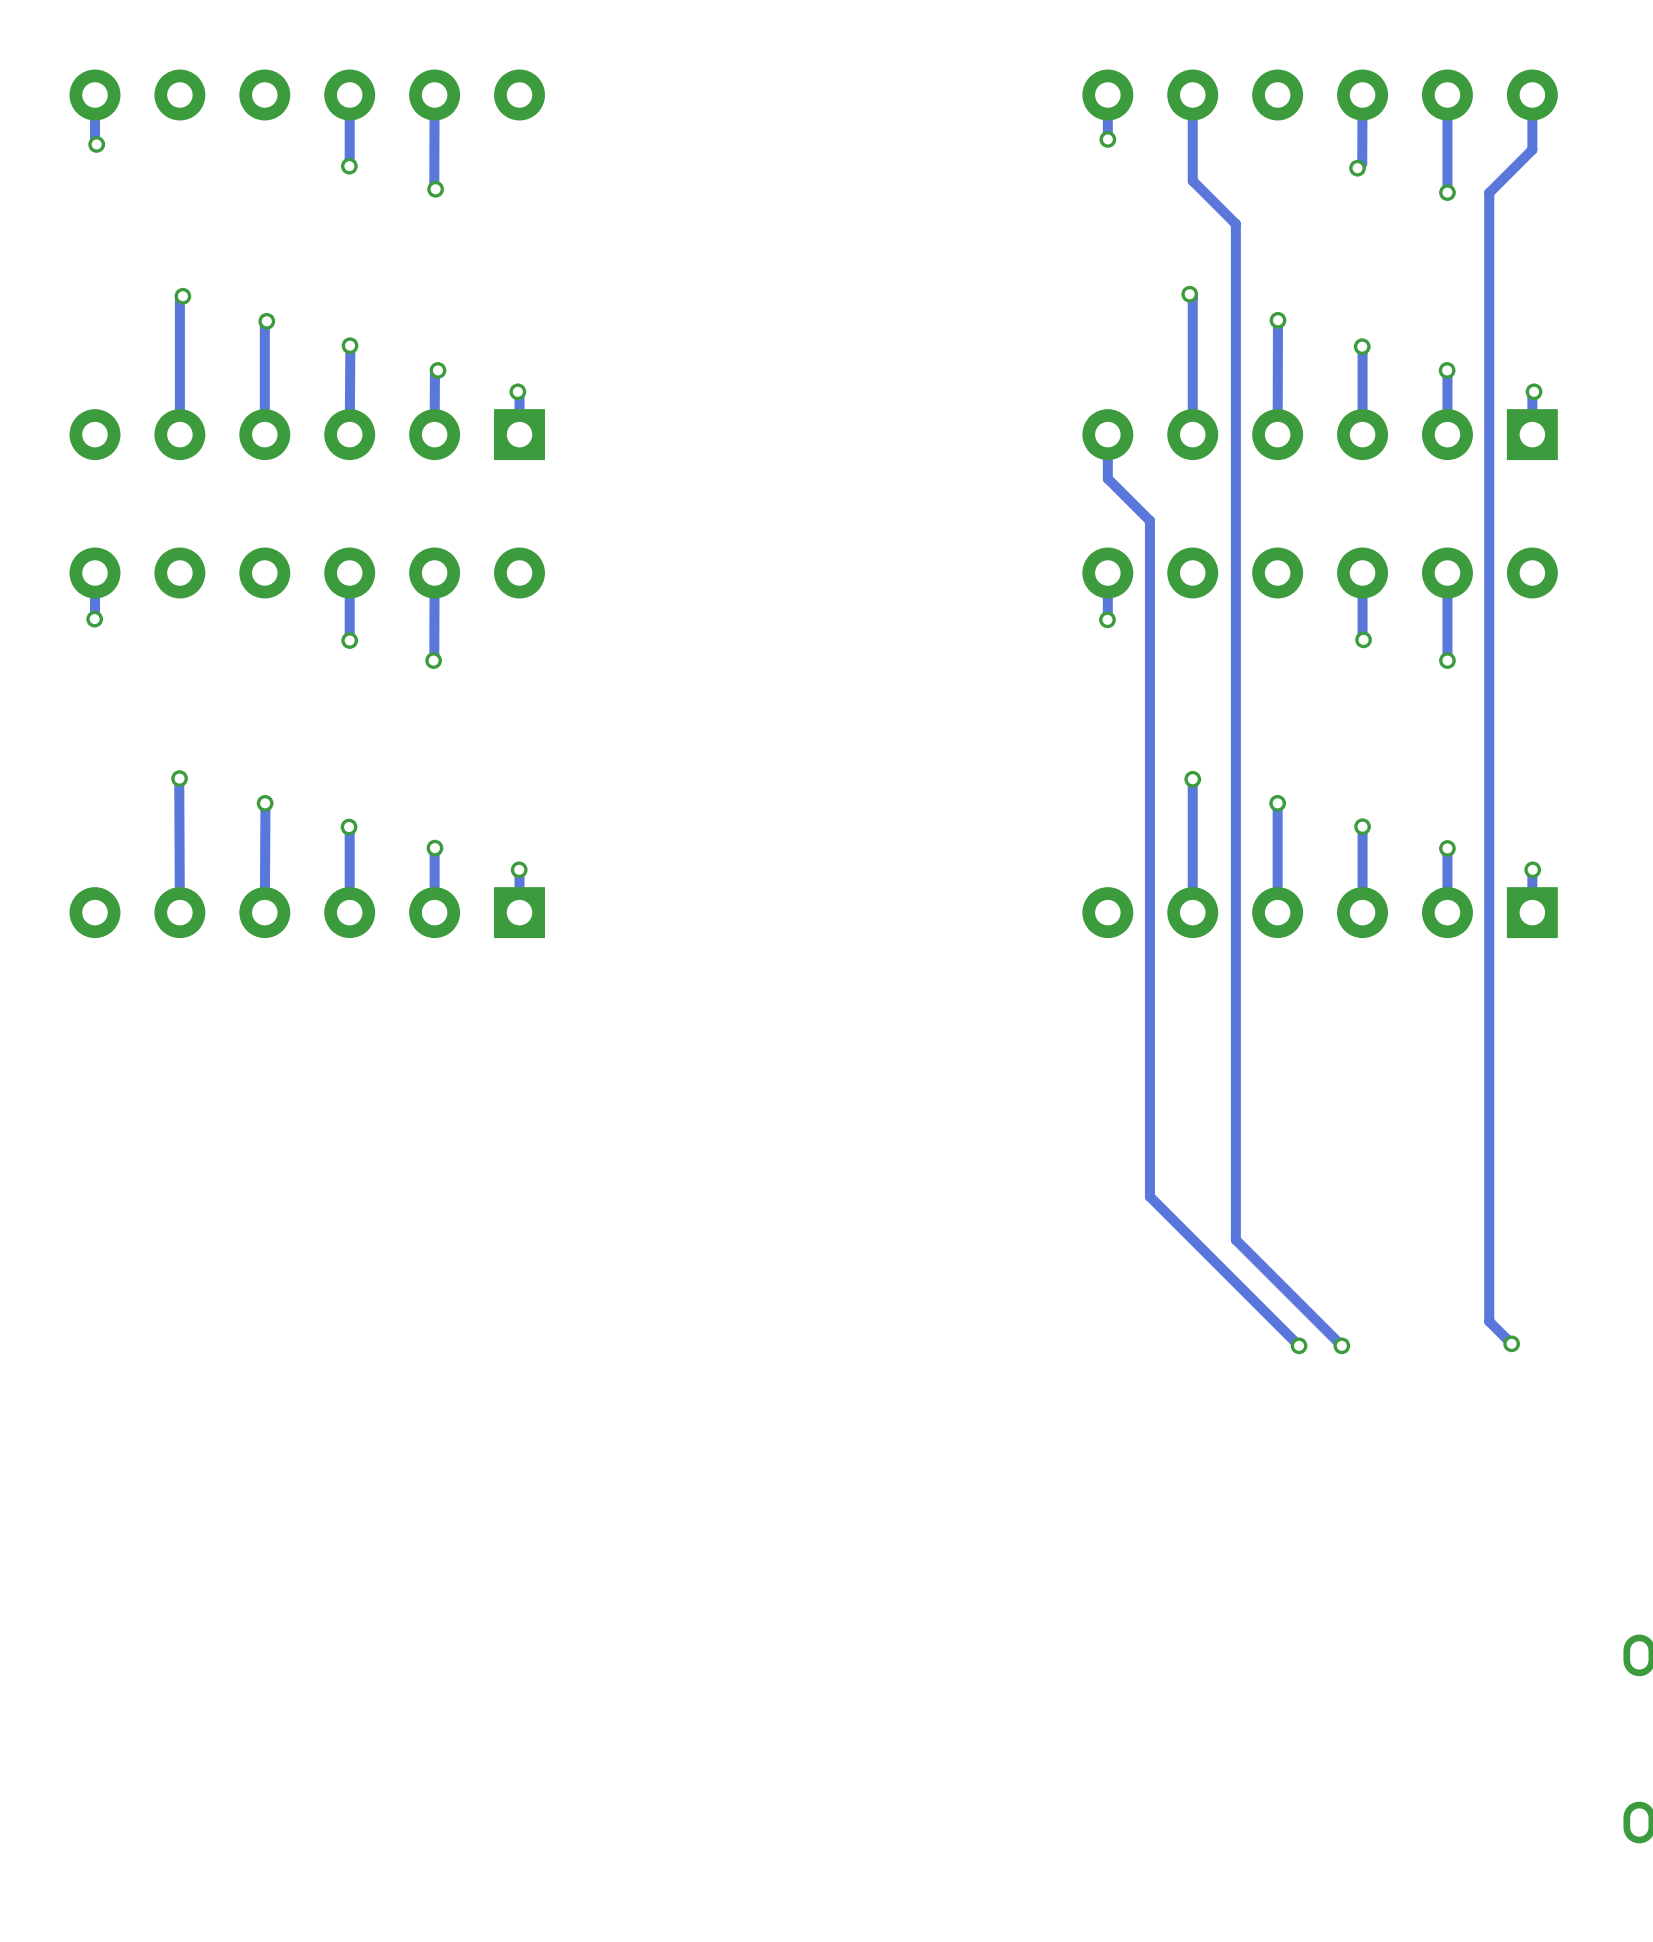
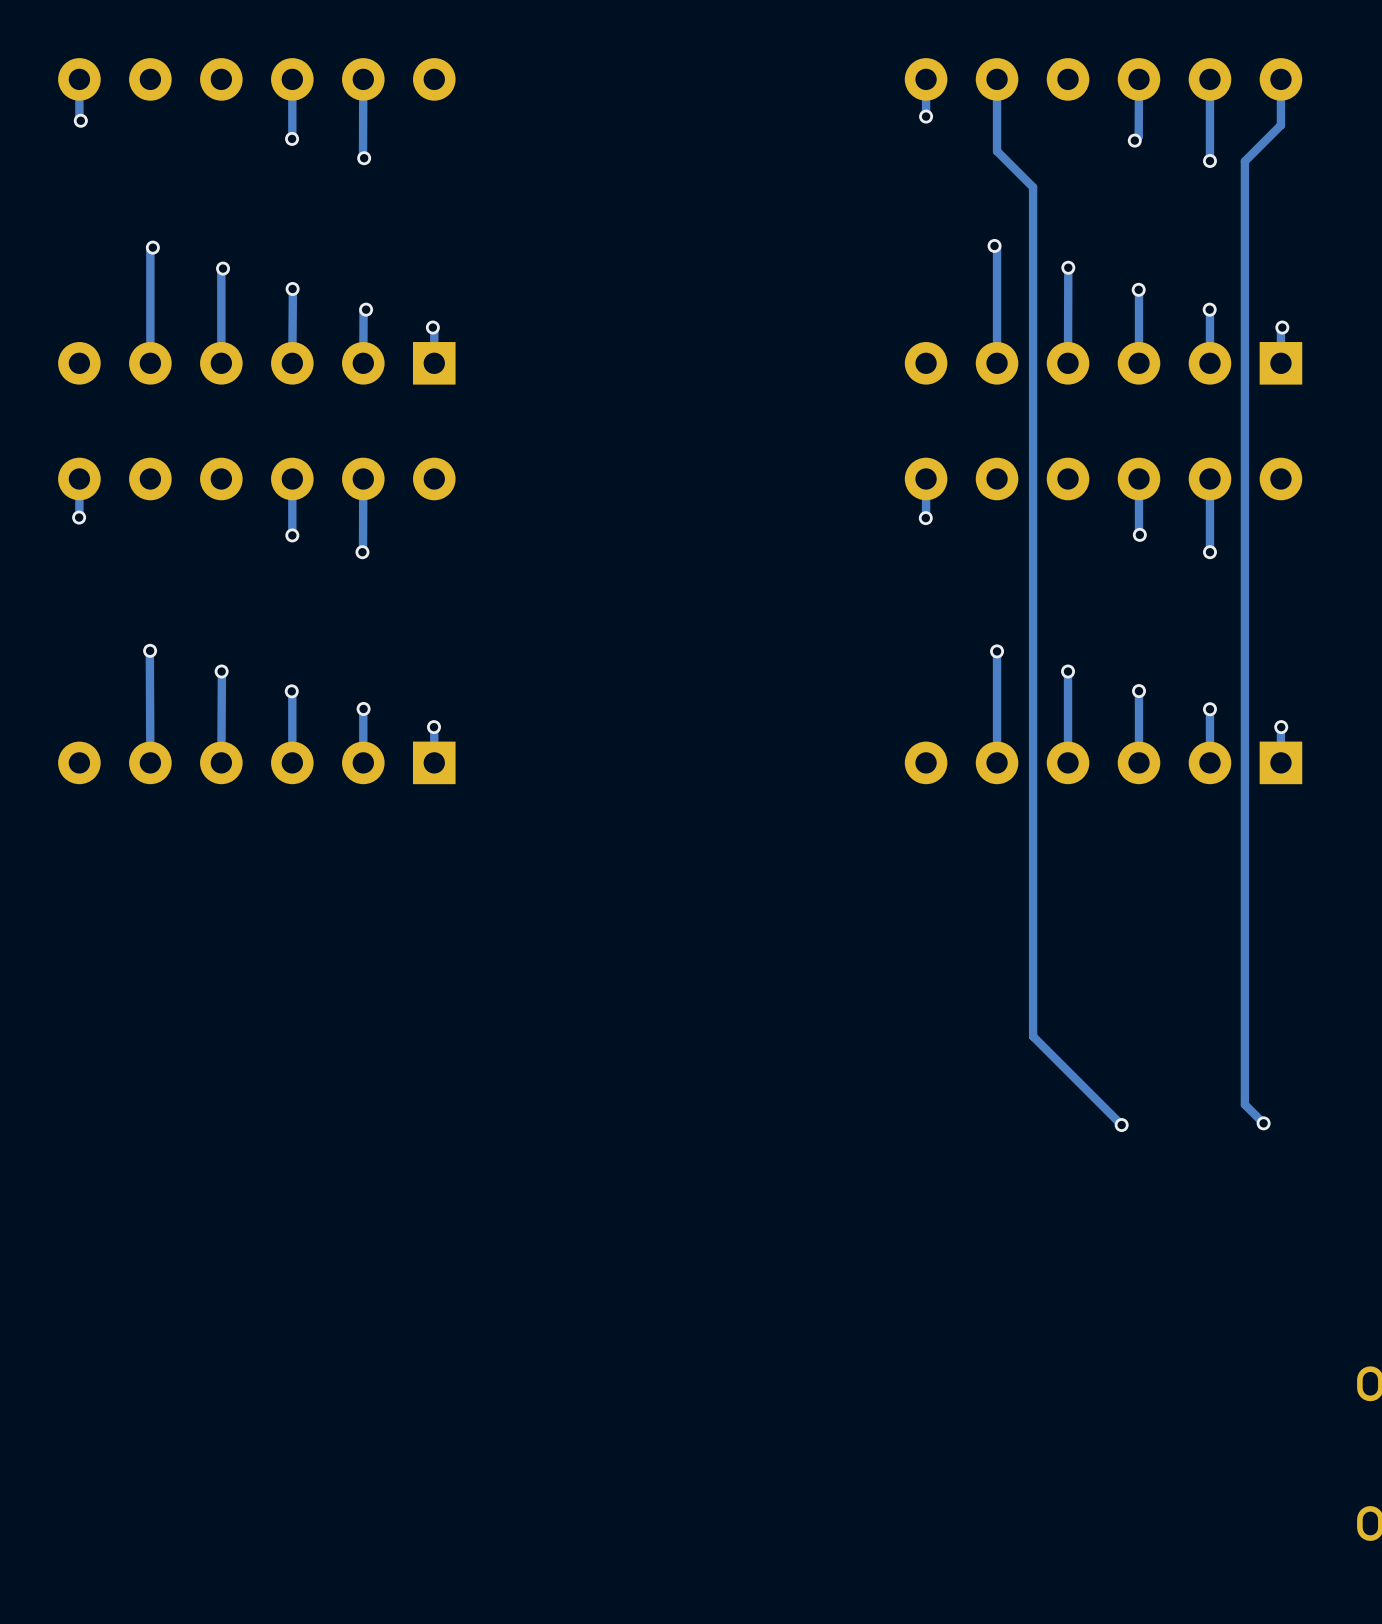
track: (1107, 434) (1107, 478) (1149, 520) (1149, 1196) (1299, 1345) -> none
via: (1299, 1345) -> none

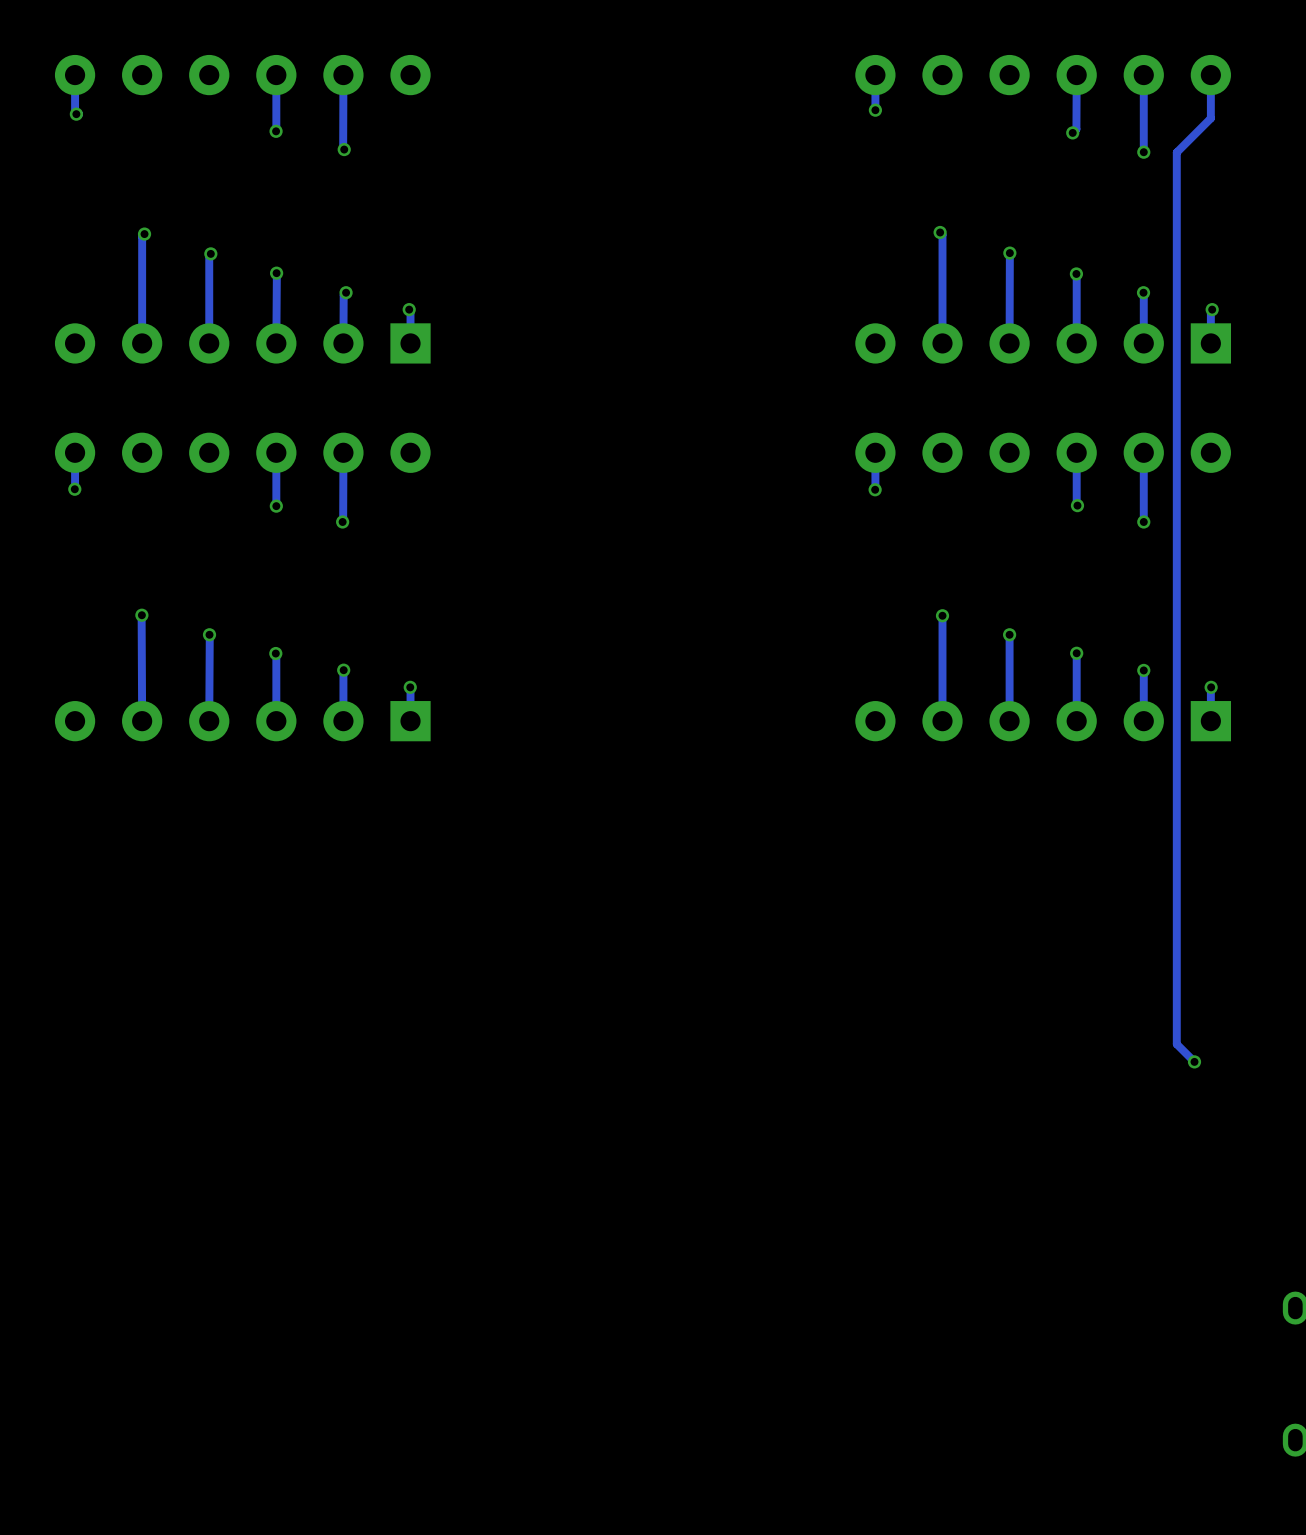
track: (997, 79) (997, 151) (1033, 187) (1033, 1036) (1121, 1125) -> none
via: (1121, 1125) -> none

